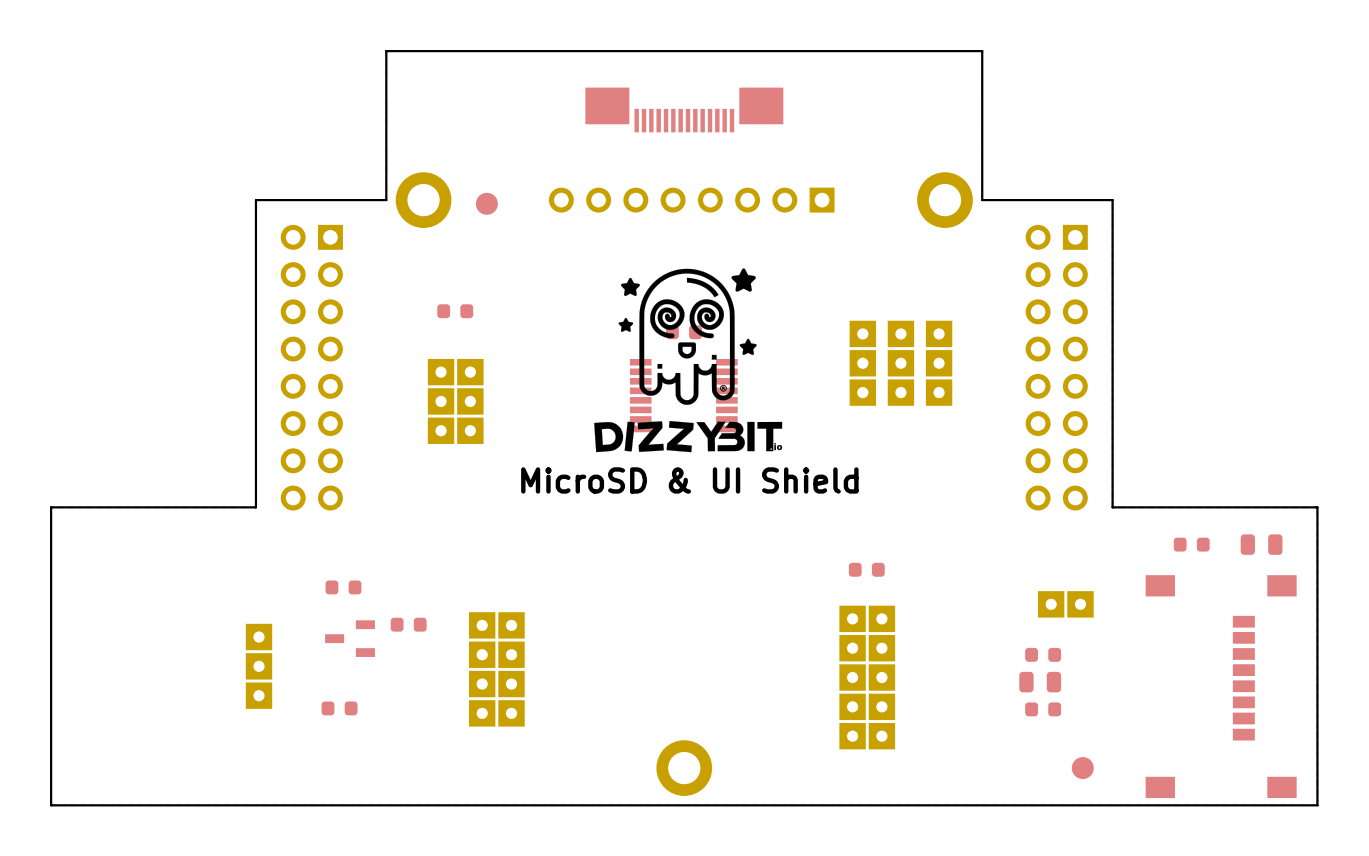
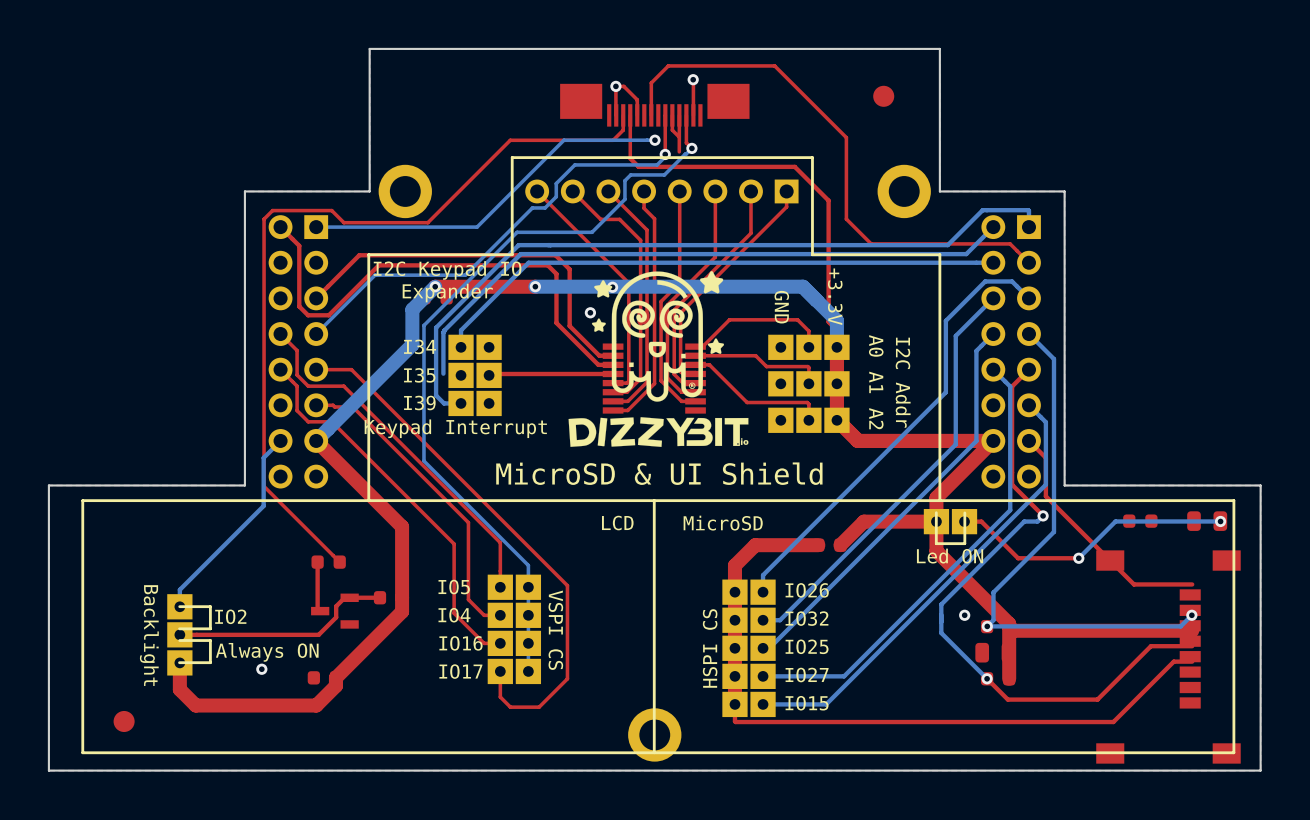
top track: none -> (693, 79) (693, 115)
via: none -> (693, 79)
via: none -> (615, 86)
part: none -> (883, 96)
top track: none -> (623, 115) (623, 130) (613, 140) (510, 140) (427, 222) (343, 222) (331, 210) (272, 210) (264, 219) (264, 486) (339, 562)
top track: none -> (630, 115) (630, 158) (638, 166) (794, 166) (828, 200) (828, 322) (836, 330) (836, 420) (857, 440) (993, 440) (936, 497) (936, 551) (1009, 623) (1009, 678)
top track: none -> (637, 115) (637, 99) (623, 86) (615, 86) (616, 115)
top track: none -> (651, 115) (651, 82) (668, 65) (774, 65) (846, 137) (846, 219) (871, 243) (1010, 243) (1028, 262)
top track: none -> (665, 115) (665, 154)
top track: none -> (672, 115) (672, 130) (679, 137)
top track: none -> (679, 115) (679, 151)
top track: none -> (686, 115) (686, 142) (691, 148)
bottom track: none -> (654, 140) (563, 140) (477, 227) (316, 227)
via: none -> (654, 140)
bottom track: none -> (691, 148) (664, 174) (630, 174) (624, 180) (624, 199) (592, 232) (517, 232) (423, 325) (423, 461) (528, 565) (528, 671)
via: none -> (691, 148)
via: none -> (665, 154)
bottom track: none -> (665, 156) (657, 164) (574, 164) (556, 183) (556, 196) (545, 207) (532, 207) (465, 275) (375, 275) (316, 334)
top track: none -> (537, 191) (628, 283) (628, 381) (627, 383) (613, 383)
top track: none -> (572, 191) (600, 219) (619, 219) (640, 240) (640, 378) (627, 392) (613, 392)
top track: none -> (608, 191) (647, 230) (647, 382) (627, 401) (613, 401)
top track: none -> (644, 191) (644, 208) (654, 218) (654, 383) (627, 410) (613, 410)
top track: none -> (679, 191) (679, 282) (661, 301) (661, 380) (681, 401) (695, 401)
top track: none -> (715, 191) (715, 257) (667, 305) (667, 378) (681, 392) (695, 392)
top track: none -> (750, 191) (750, 233) (674, 309) (674, 374) (683, 383) (695, 383)
top track: none -> (786, 191) (786, 206) (680, 312) (680, 371) (695, 373)
part: (486, 203) -> none
top track: none -> (280, 227) (299, 245) (299, 306) (308, 315) (328, 315) (378, 265) (547, 265) (556, 274) (556, 322) (598, 364) (613, 364)
bottom track: none -> (993, 227) (966, 254) (520, 254) (444, 330) (443, 373)
bottom track: none -> (1028, 227) (1028, 210) (982, 210) (947, 245) (518, 245) (436, 327) (436, 395) (444, 403) (461, 403)
bottom track: none -> (993, 262) (528, 262) (461, 330) (461, 347)
text: none -> I2C Keypad IO (447, 270)
bottom track: none -> (435, 286) (412, 309) (412, 344) (316, 440)
via: none -> (435, 286)
top track: none -> (535, 286) (435, 286)
bottom track: none -> (535, 286) (802, 286) (836, 320) (836, 347)
via: none -> (535, 286)
via: none -> (612, 287)
text: none -> Expander (447, 293)
top track: none -> (316, 298) (359, 255) (555, 255) (569, 269) (569, 326) (599, 355) (613, 355)
text: none -> +3.3V (835, 296)
bottom track: none -> (993, 298) (955, 335) (955, 444) (780, 620) (763, 620)
bottom track: none -> (1028, 298) (1012, 281) (985, 281) (945, 320) (945, 392) (763, 575) (763, 592)
text: none -> GND (781, 307)
via: none -> (590, 312)
top track: none -> (280, 334) (297, 350) (297, 374) (308, 386) (343, 386) (500, 542) (500, 587)
bottom track: none -> (993, 334) (976, 350) (976, 441) (769, 648) (763, 648)
bottom track: none -> (1028, 334) (1053, 359) (1053, 531) (993, 592) (993, 620) (987, 626) (1180, 626) (1191, 615)
drawing position: (688, 360) -> (658, 359)
text: none -> A0 (876, 345)
text: none -> I34 (420, 346)
top track: none -> (695, 346) (702, 346) (729, 319) (797, 319) (808, 331) (808, 347)
part rotation: 0° (900, 363) -> 90° clockwise (808, 383)
part position: (900, 363) -> (808, 383)
top track: none -> (695, 355) (755, 355) (766, 366) (807, 366) (808, 383)
top track: none -> (695, 364) (709, 364) (747, 402) (807, 402) (808, 420)
top track: none -> (280, 369) (297, 386) (297, 410) (308, 421) (331, 421) (454, 544) (454, 613) (484, 643) (500, 643)
top track: none -> (316, 369) (351, 369) (567, 585) (567, 678) (539, 707) (510, 707) (500, 697) (500, 671) (494, 671)
bottom track: none -> (993, 369) (1010, 386) (1010, 510) (844, 676) (763, 676)
top track: none -> (1028, 369) (1012, 386) (1012, 484) (1043, 515)
top track: none -> (613, 373) (489, 375)
text: none -> I35 (419, 375)
text: none -> A1 (876, 382)
text: none -> I2C Addr (903, 382)
part position: (455, 401) -> (475, 375)
text: none -> I39 (419, 403)
top track: none -> (316, 405) (352, 407) (468, 522) (468, 599) (484, 615) (500, 615)
bottom track: none -> (1028, 405) (1045, 422) (1045, 484) (826, 704) (763, 704)
text: none -> A2 (876, 418)
text: none -> Keypad Interrupt (455, 428)
bottom track: none -> (280, 440) (263, 457) (263, 506) (179, 589) (179, 606)
top track: none -> (316, 440) (402, 526) (402, 611) (335, 677) (335, 685) (316, 705) (195, 705) (179, 689) (179, 662)
top track: none -> (1028, 440) (1045, 457) (1045, 496) (1134, 584) (1192, 584)
text position: MicroSD & UI Shield (689, 480) -> MicroSD & UI Shield (659, 473)
line: none -> (654, 500) (654, 752)
line: none -> (939, 500) (939, 254) (812, 254) (812, 157) (512, 157) (512, 254) (368, 254) (368, 500)
line: none -> (1233, 500) (82, 500) (82, 752) (1233, 752) (1233, 500)
line: none -> (936, 512) (936, 543) (964, 543) (964, 512)
bottom track: none -> (1043, 515) (1037, 521) (1024, 521) (941, 604) (941, 633) (987, 678)
via: none -> (1043, 515)
bottom track: none -> (1220, 521) (1115, 521) (1078, 558)
via: none -> (1220, 521)
top track: none -> (936, 521) (863, 521) (840, 545)
top track: none -> (964, 521) (981, 521) (1018, 558) (1078, 558)
text: none -> LCD (617, 523)
text: none -> MicroSD (723, 523)
top track: none -> (818, 545) (755, 545) (734, 565) (735, 722) (1113, 722) (1173, 661) (1192, 661)
text: none -> Led ON (950, 556)
via: none -> (1078, 558)
top track: none -> (317, 562) (317, 608) (320, 611)
part position: (1065, 604) -> (950, 521)
text: none -> IO5 (454, 587)
text: none -> IO26 (807, 590)
top track: none -> (379, 597) (344, 597) (336, 606) (336, 617) (318, 634) (179, 634)
line: none -> (179, 606) (210, 606) (210, 628) (179, 628)
text: none -> IO4 (454, 615)
via: none -> (964, 615)
via: none -> (1191, 615)
text: none -> IO2 (230, 616)
text: none -> IO32 (807, 618)
via: none -> (987, 626)
top track: none -> (1009, 626) (1013, 630) (1192, 630)
text: none -> VSPI CS (555, 630)
text: none -> Backlight (149, 635)
part position: (258, 666) -> (179, 634)
line: none -> (179, 640) (210, 640) (210, 662) (179, 662)
part position: (496, 669) -> (514, 629)
text: none -> IO16 (461, 643)
text: none -> IO25 (807, 646)
top track: none -> (1192, 646) (1150, 646) (1097, 699) (1007, 699) (987, 678)
text: none -> HSPI CS (710, 648)
part position: (867, 677) -> (749, 648)
text: none -> Always ON (267, 652)
via: none -> (261, 669)
text: none -> IO17 (460, 671)
text: none -> IO27 (807, 675)
via: none -> (987, 678)
text: none -> IO15 (807, 703)
part: none -> (124, 721)
part: (1082, 768) -> none

